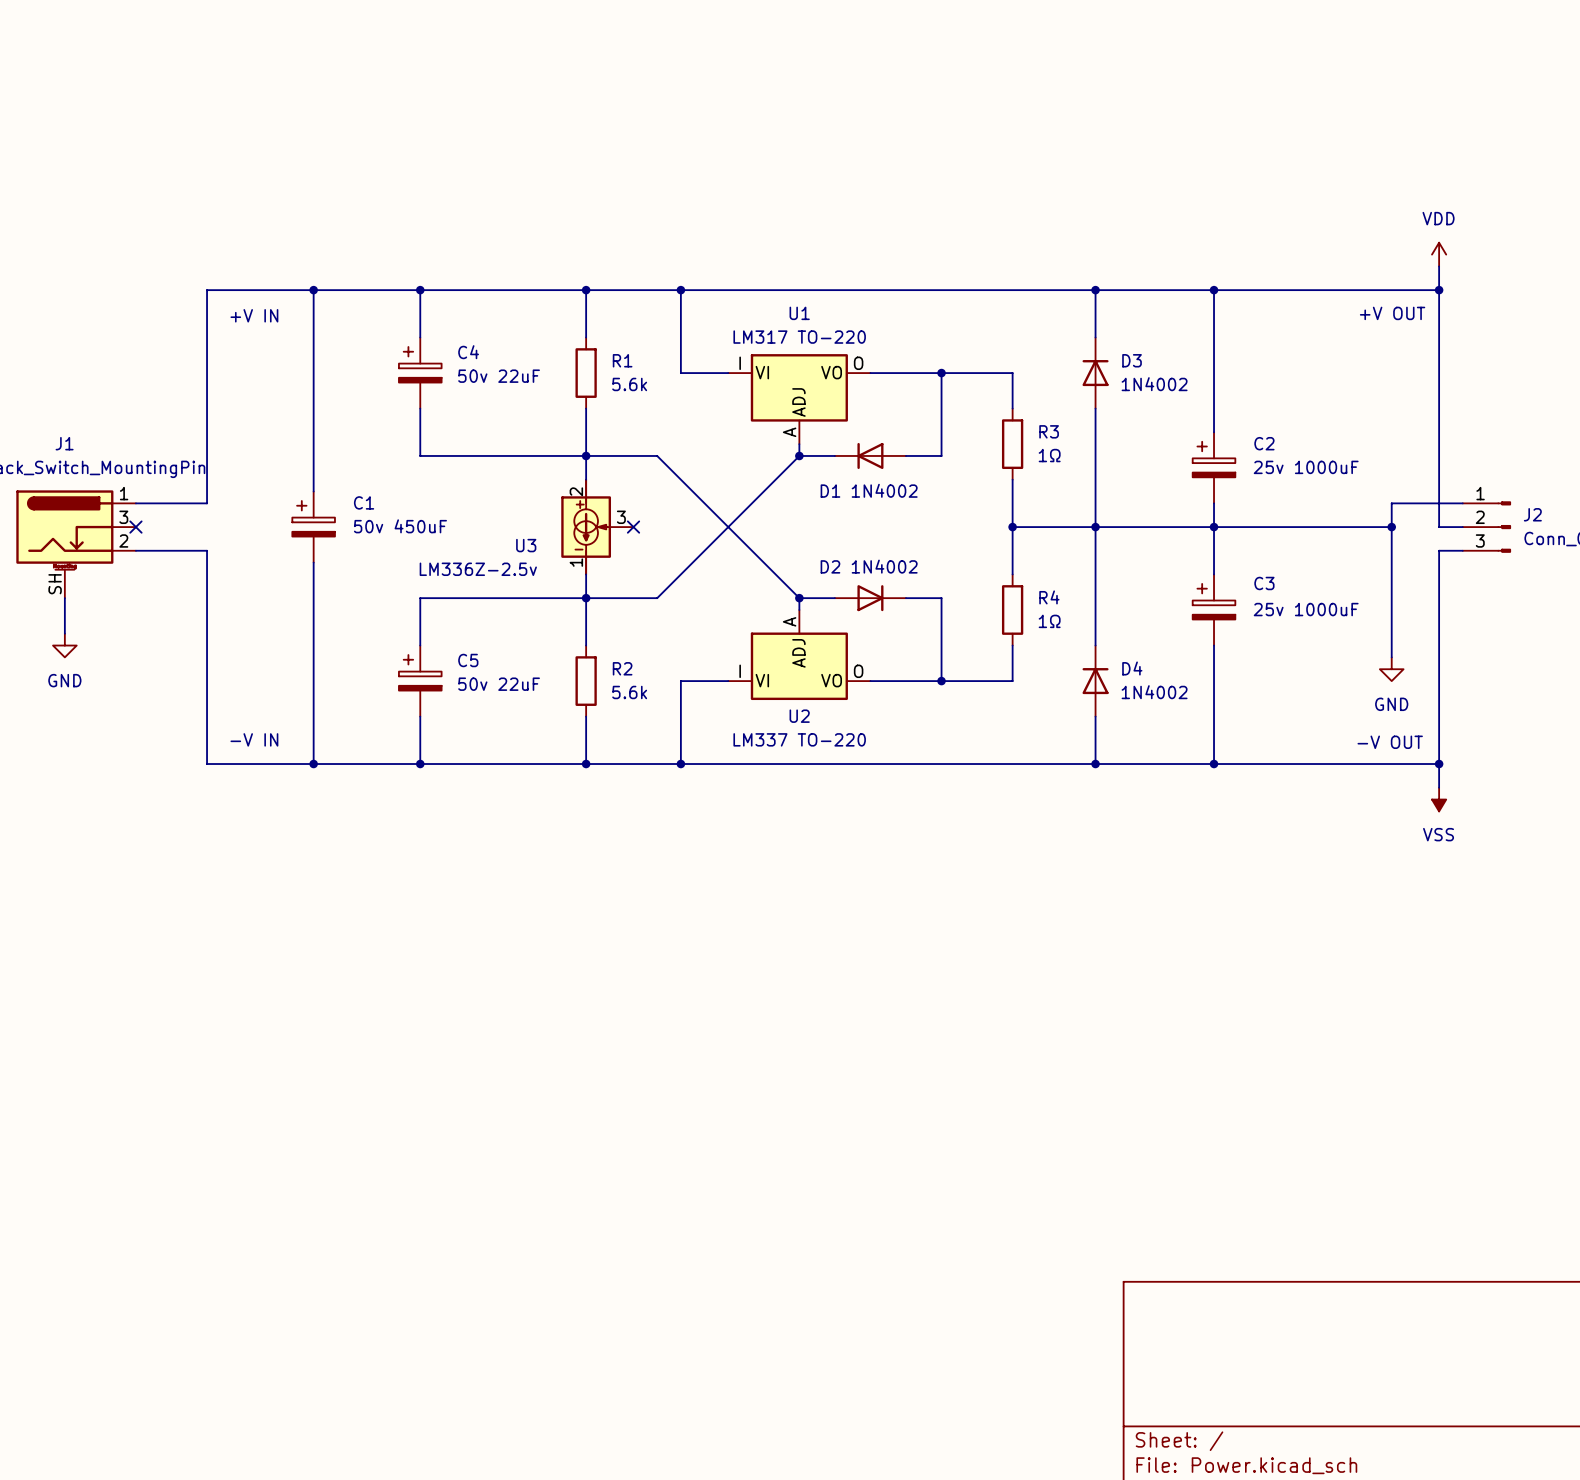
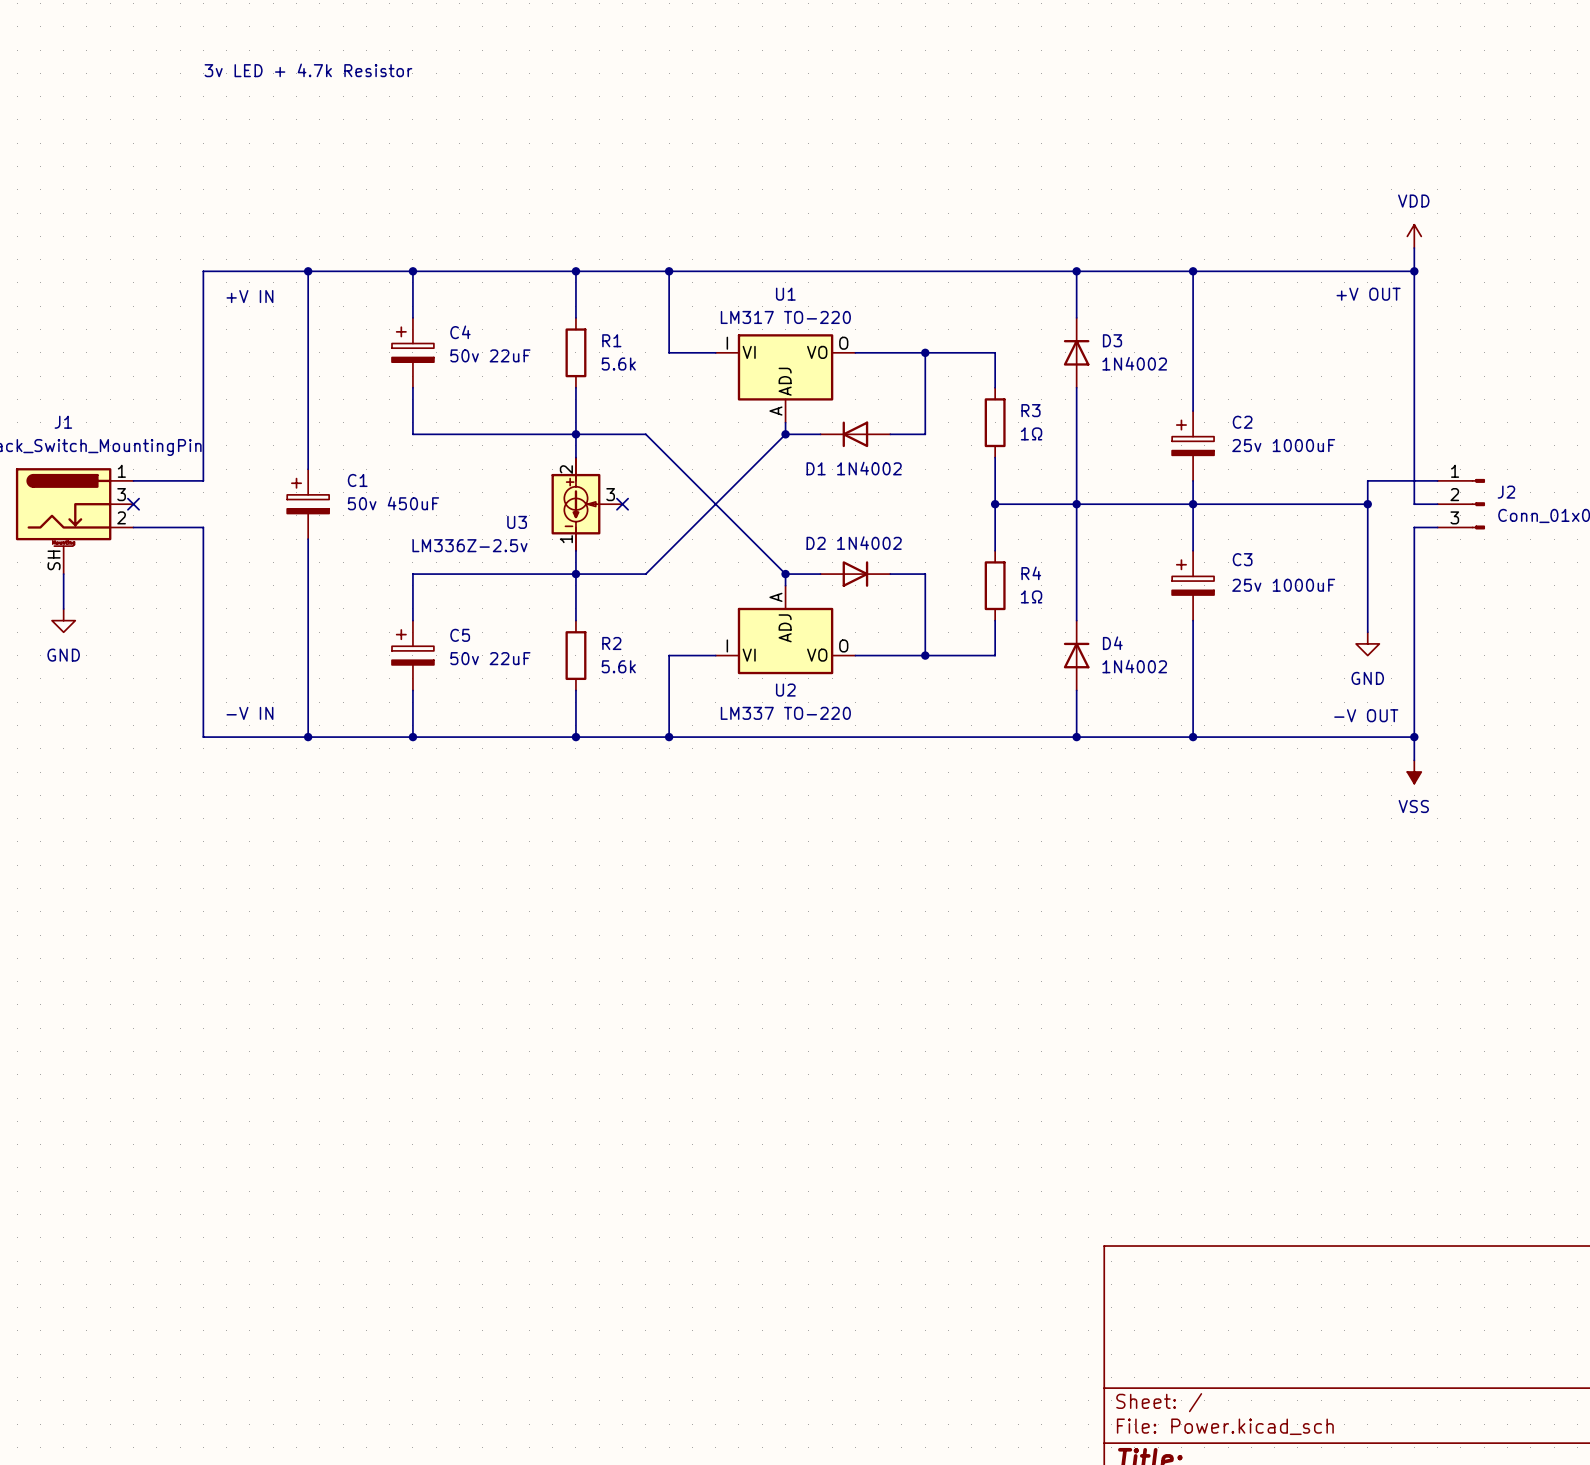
text: none -> 3v LED + 4.7k Resistor (308, 70)

